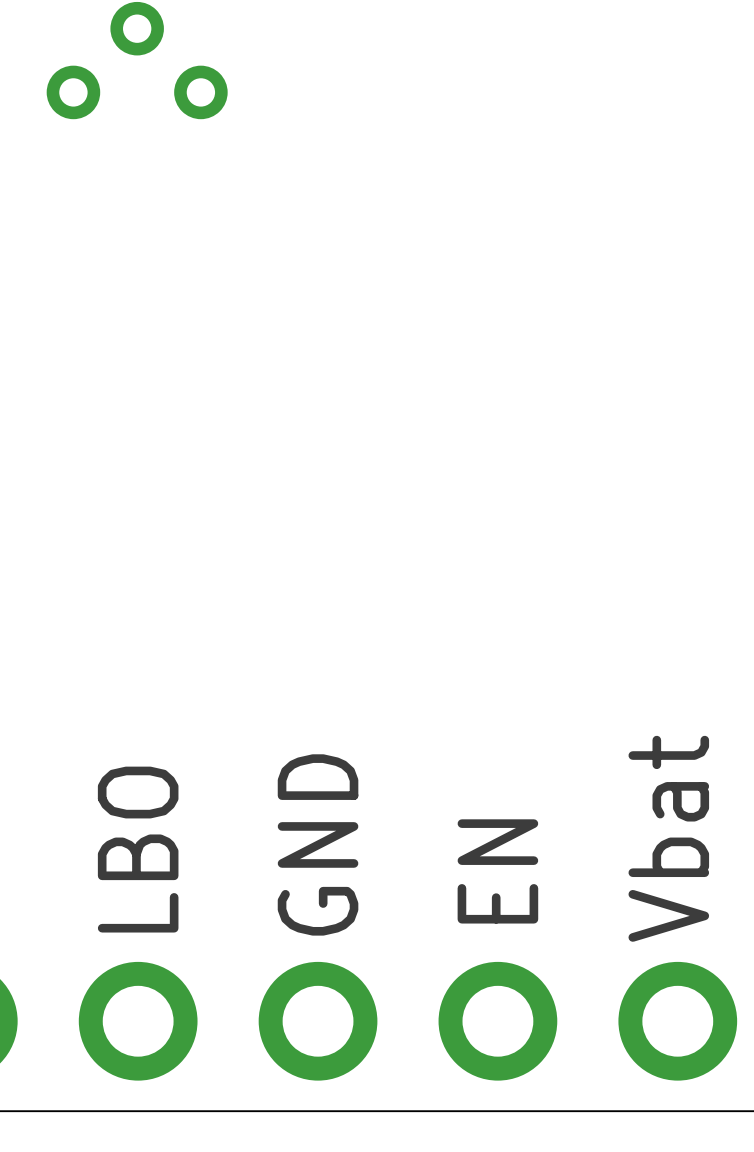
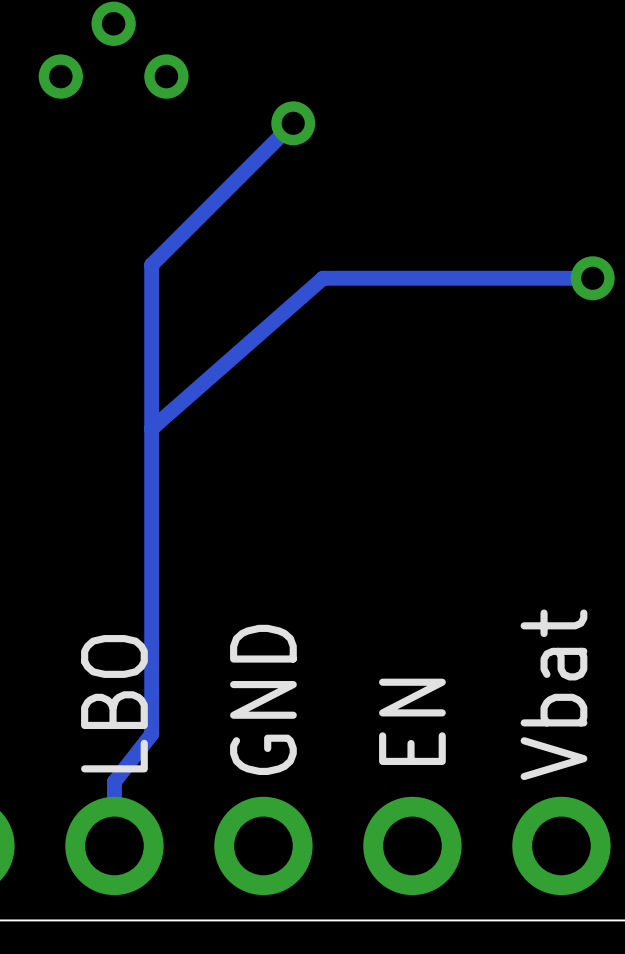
track: none -> (293, 123) (151, 264) (151, 734) (114, 781) (114, 845)
via: none -> (293, 123)
track: none -> (592, 278) (323, 278) (151, 428)
via: none -> (592, 278)

